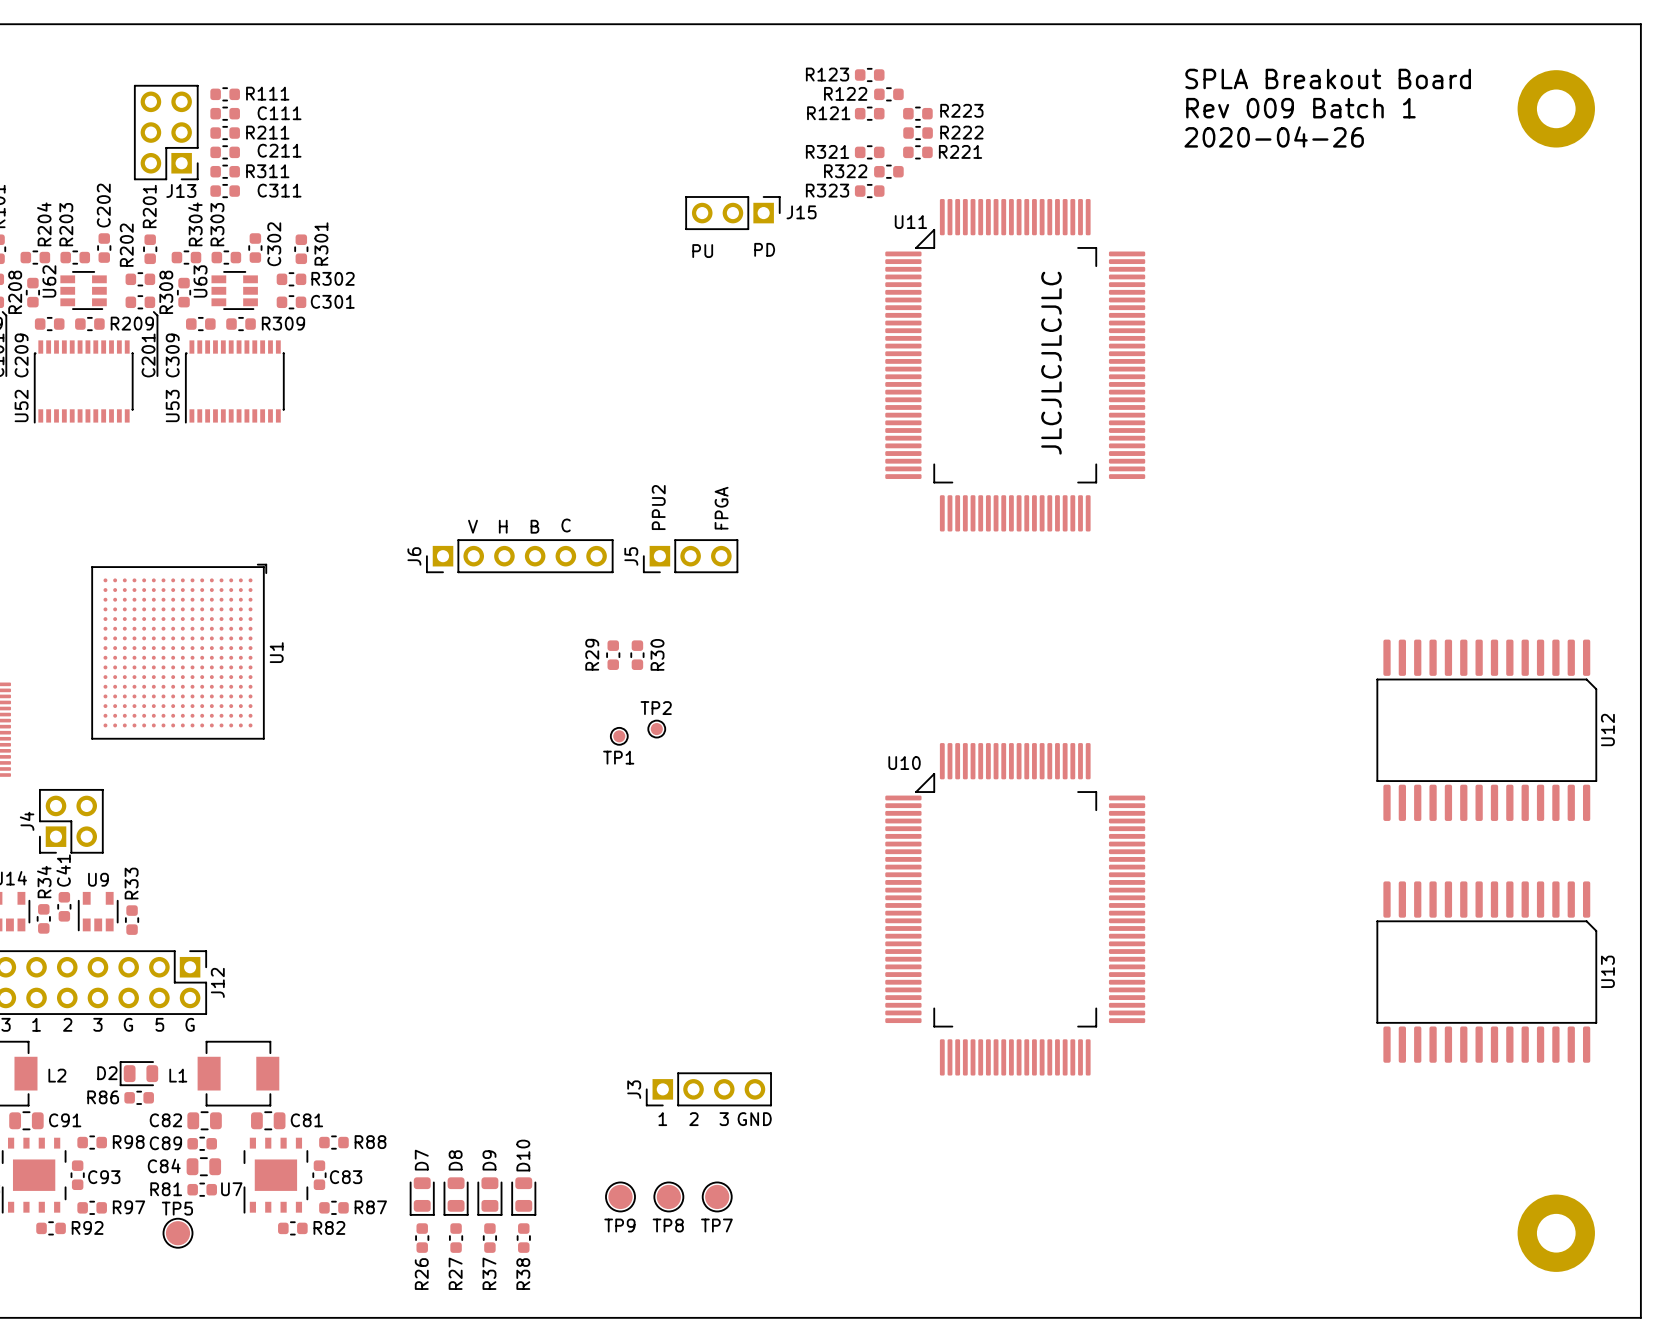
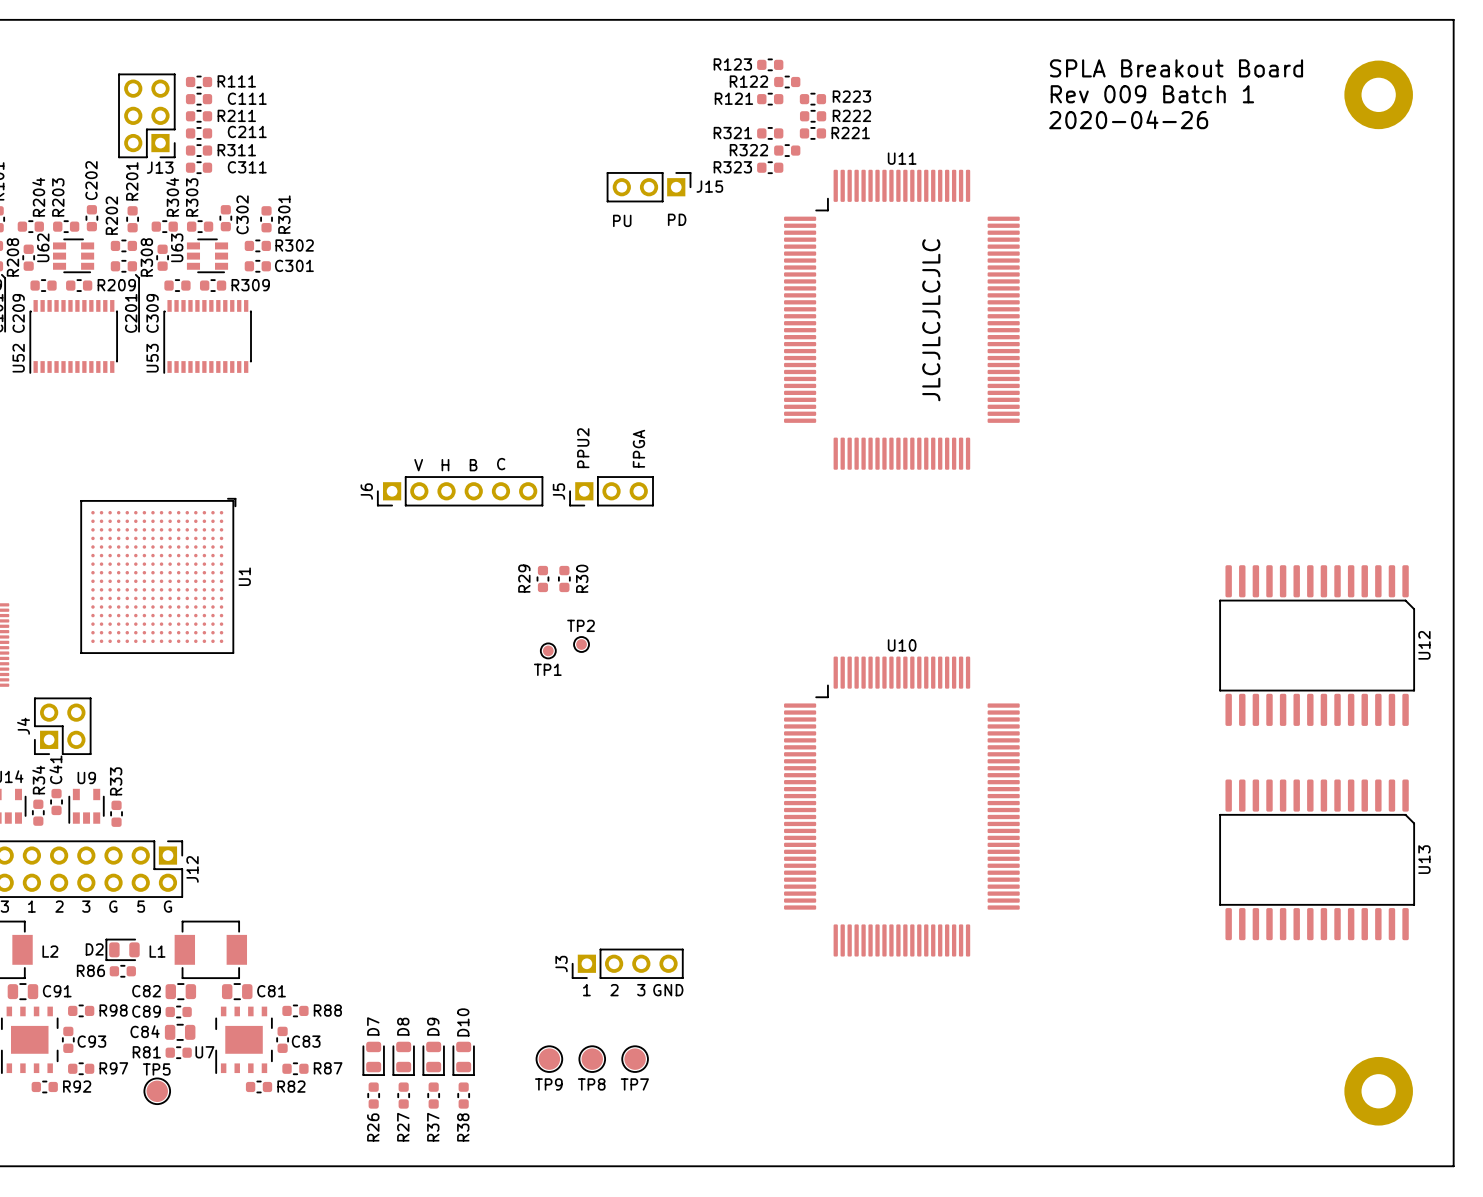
U11 footprint: [885, 199, 1146, 532] -> [784, 169, 1020, 470]
U11 name position: U11 (910, 222) -> U11 (902, 158)
U10 footprint: [885, 743, 1146, 1076] -> [784, 656, 1020, 957]
U10 name position: U10 (904, 763) -> U10 (902, 645)

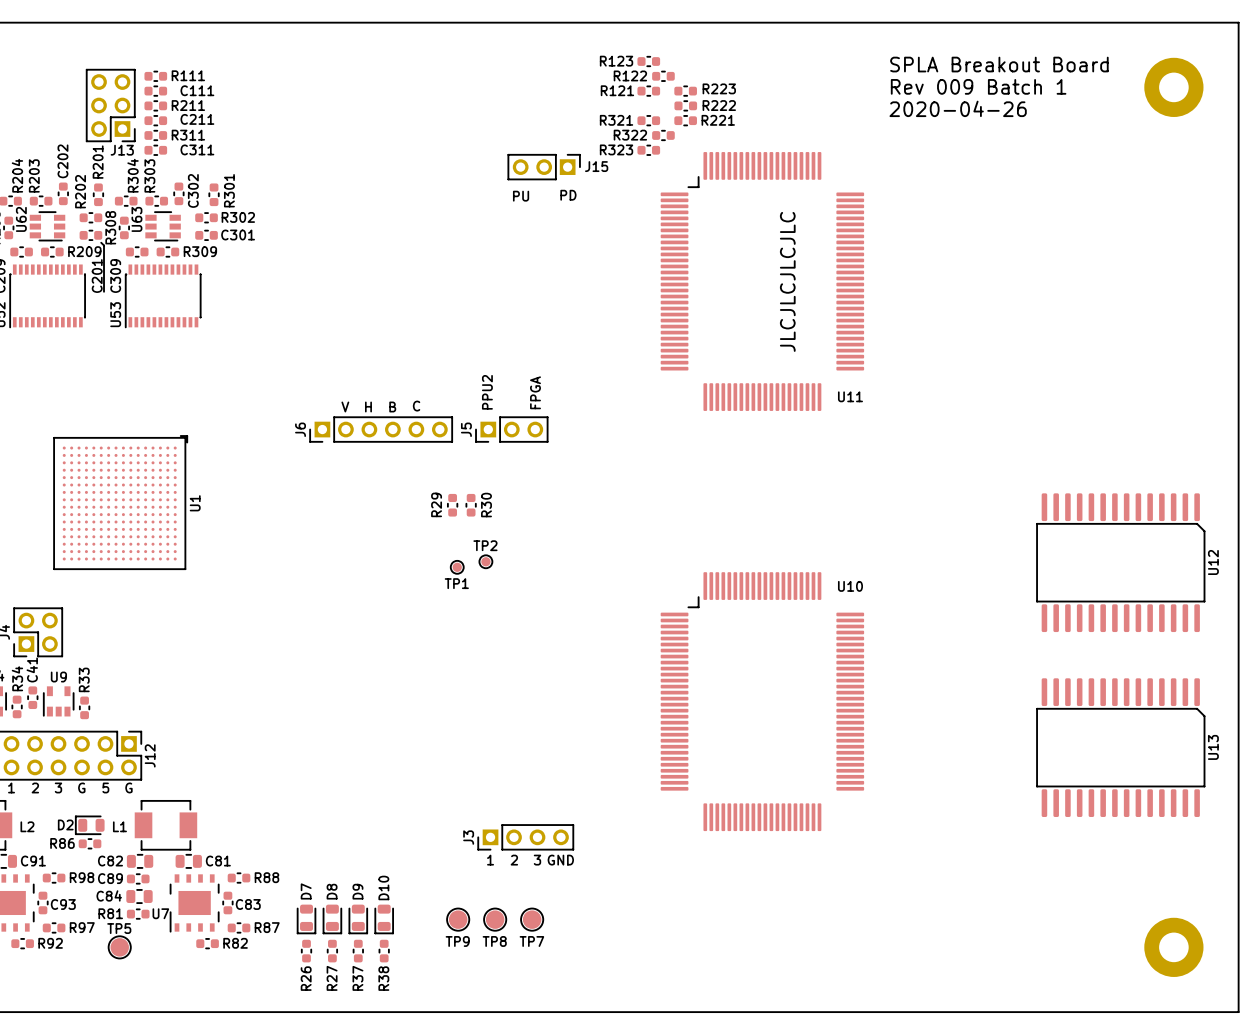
U11 name position: U11 (902, 158) -> U11 (850, 396)
U10 name position: U10 (902, 645) -> U10 (850, 586)

